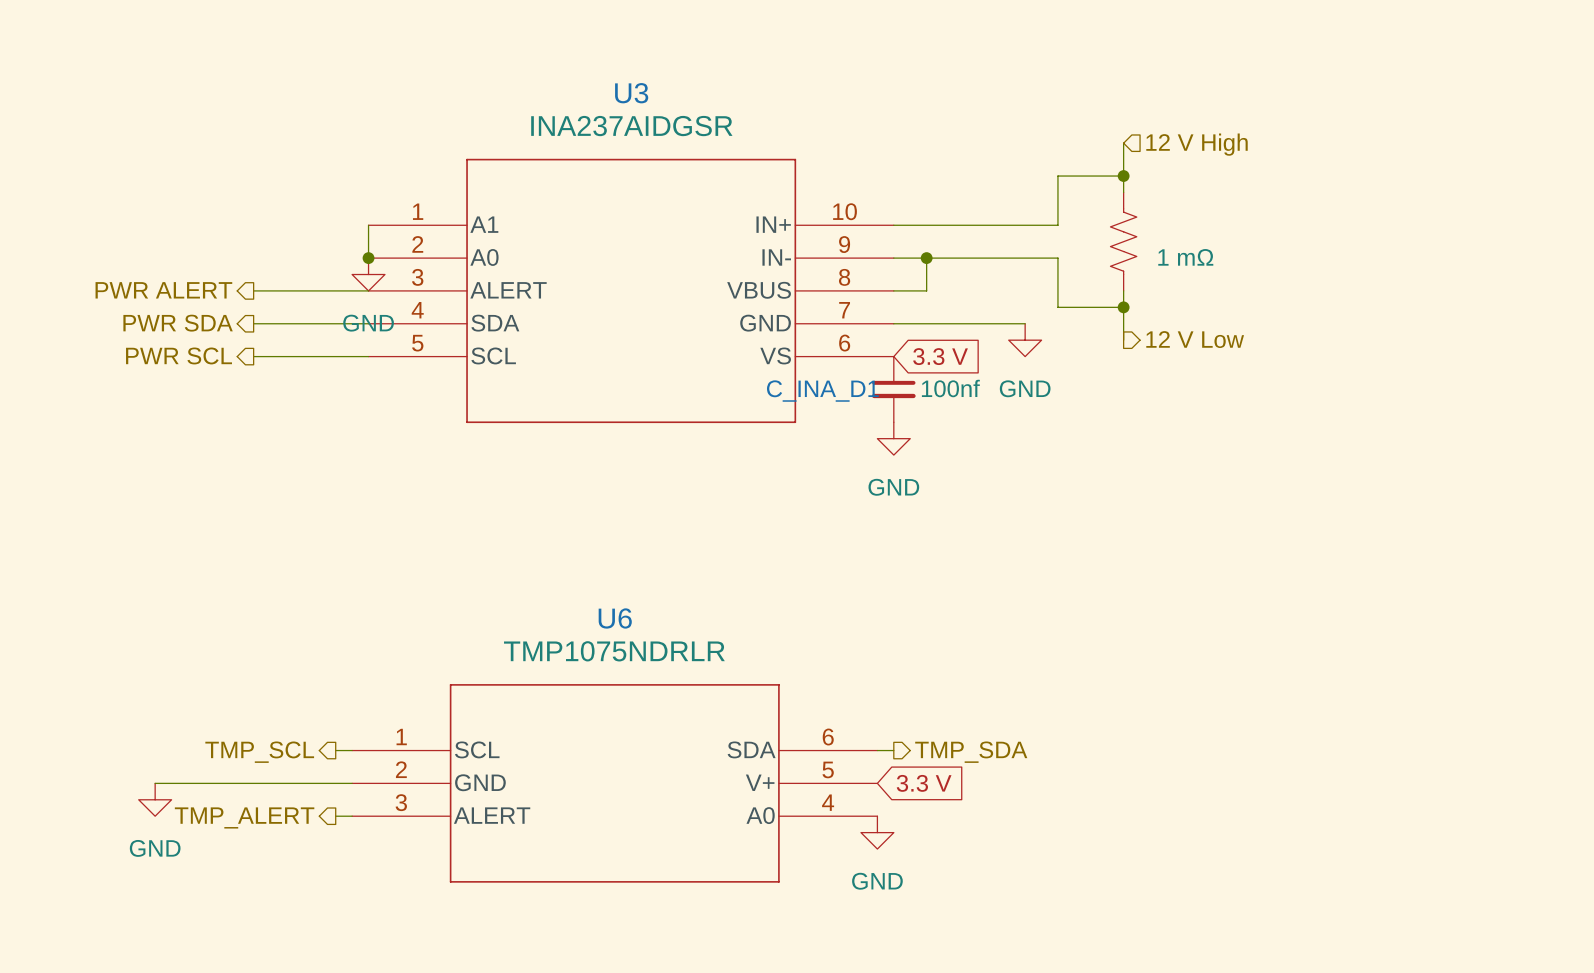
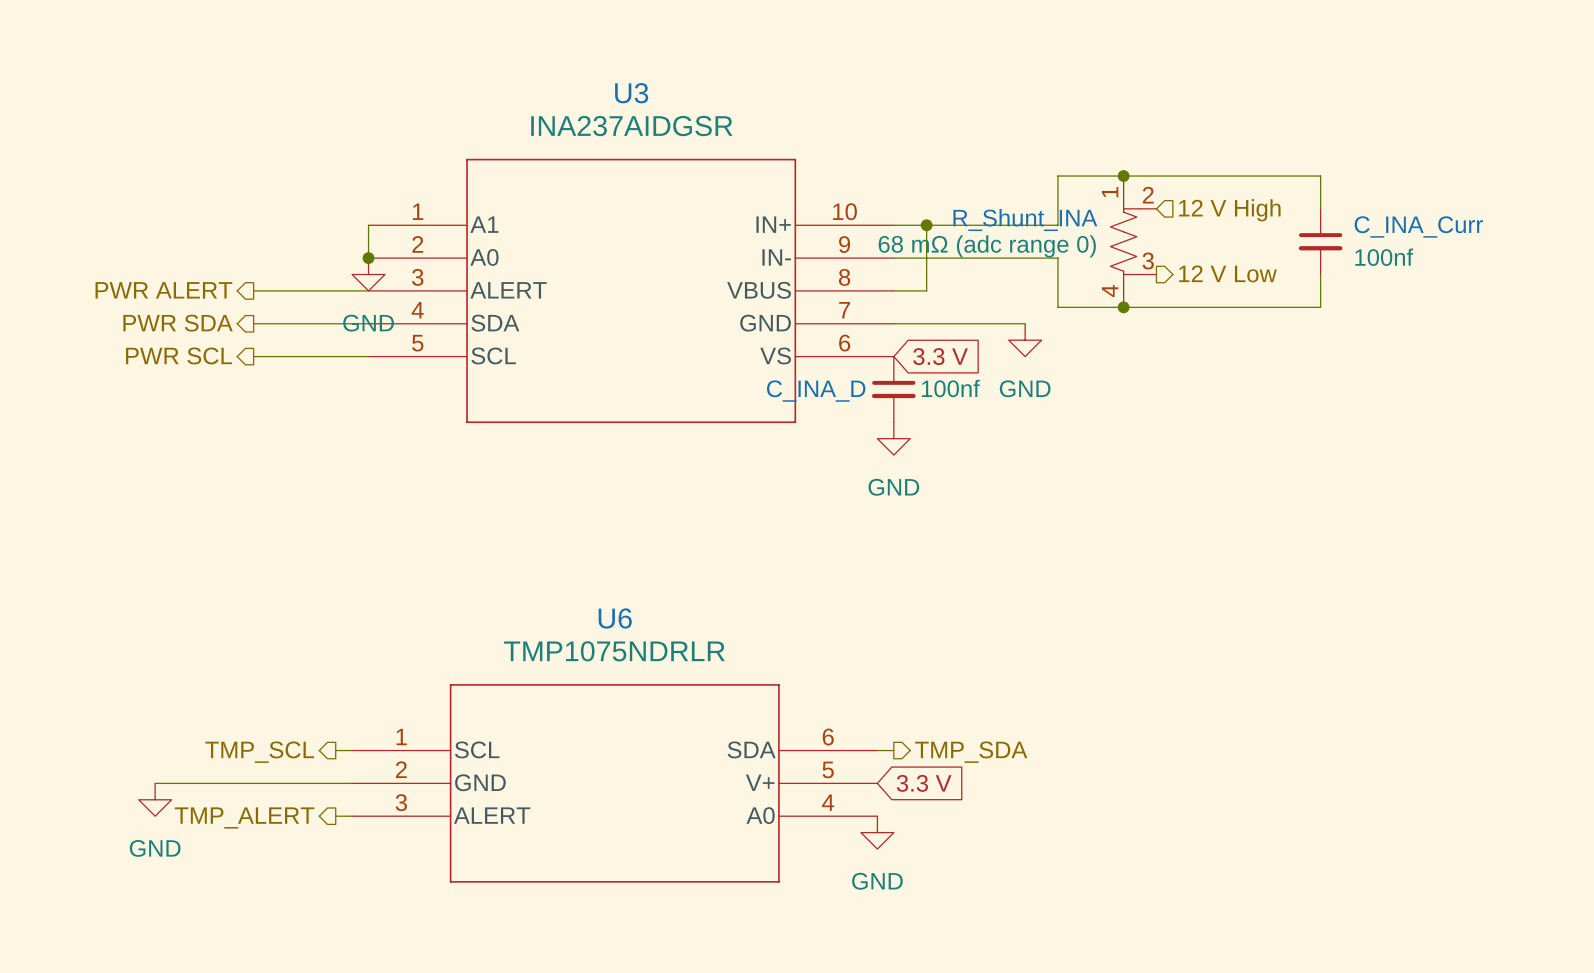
wire: (1123, 143) (1123, 192) -> none
hierarchical label position: 12 V High (1197, 144) -> 12 V High (1229, 210)
wire: none -> (1123, 176) (1320, 176) (1320, 208)
wire: none -> (926, 225) (926, 258)
part: 1 mΩ (1123, 241) -> none
R_Shunt_INA: none -> 68 mΩ (adc range 0) (1133, 241)
C_INA_Curr: none -> 100nf (1320, 241)
junction position: (926, 258) -> (926, 225)
wire: none -> (1320, 274) (1320, 307) (1123, 307)
wire: (1123, 290) (1123, 340) -> none
hierarchical label position: 12 V Low (1195, 339) -> 12 V Low (1227, 273)
C_INA_D1 name: C_INA_D1 (822, 391) -> C_INA_D (816, 391)

